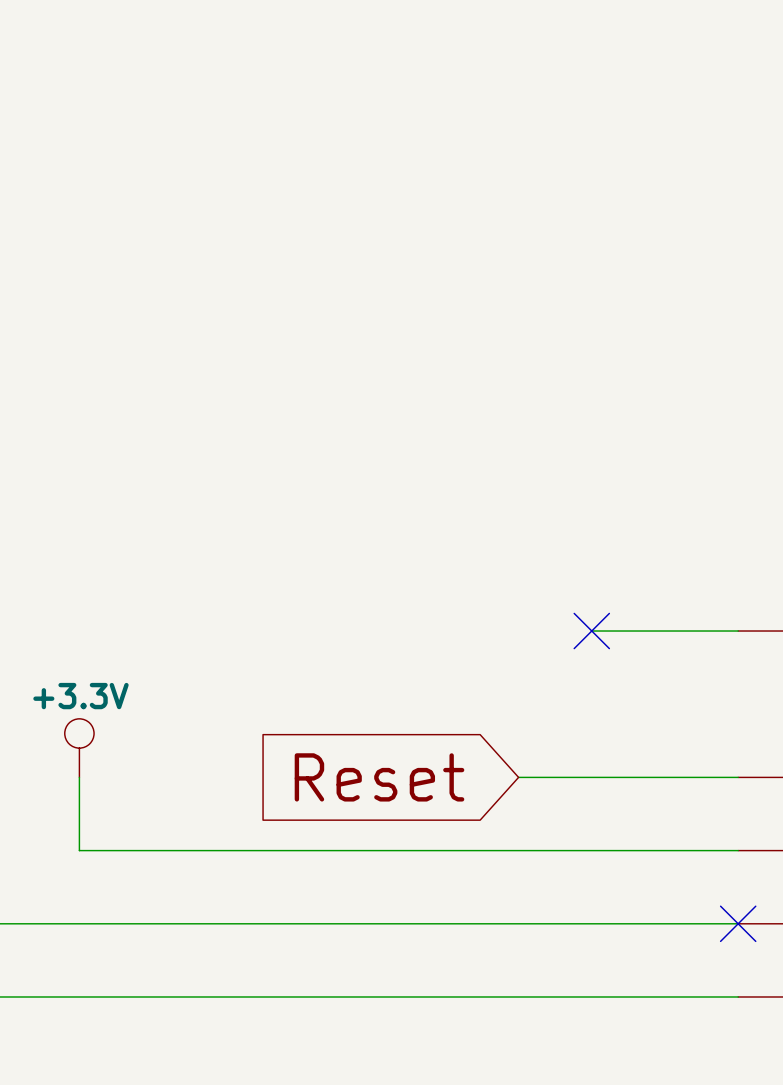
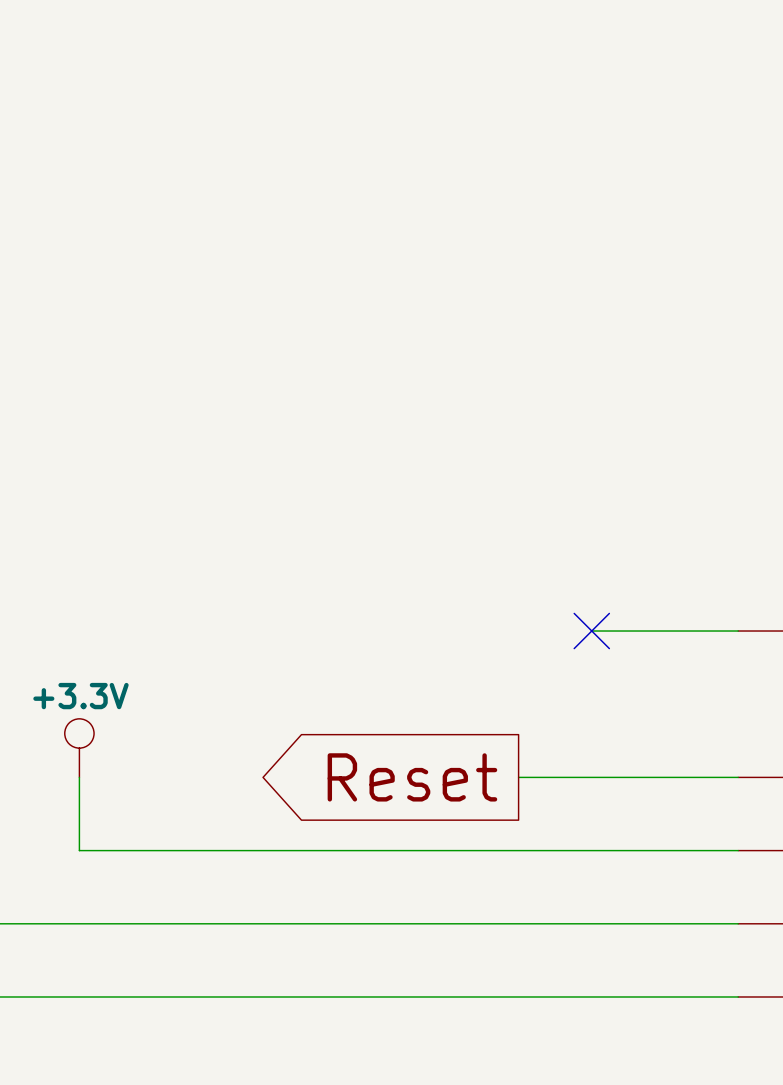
global label shape: input (379, 777) -> output (412, 777)
no-connect mark: (738, 923) -> none

